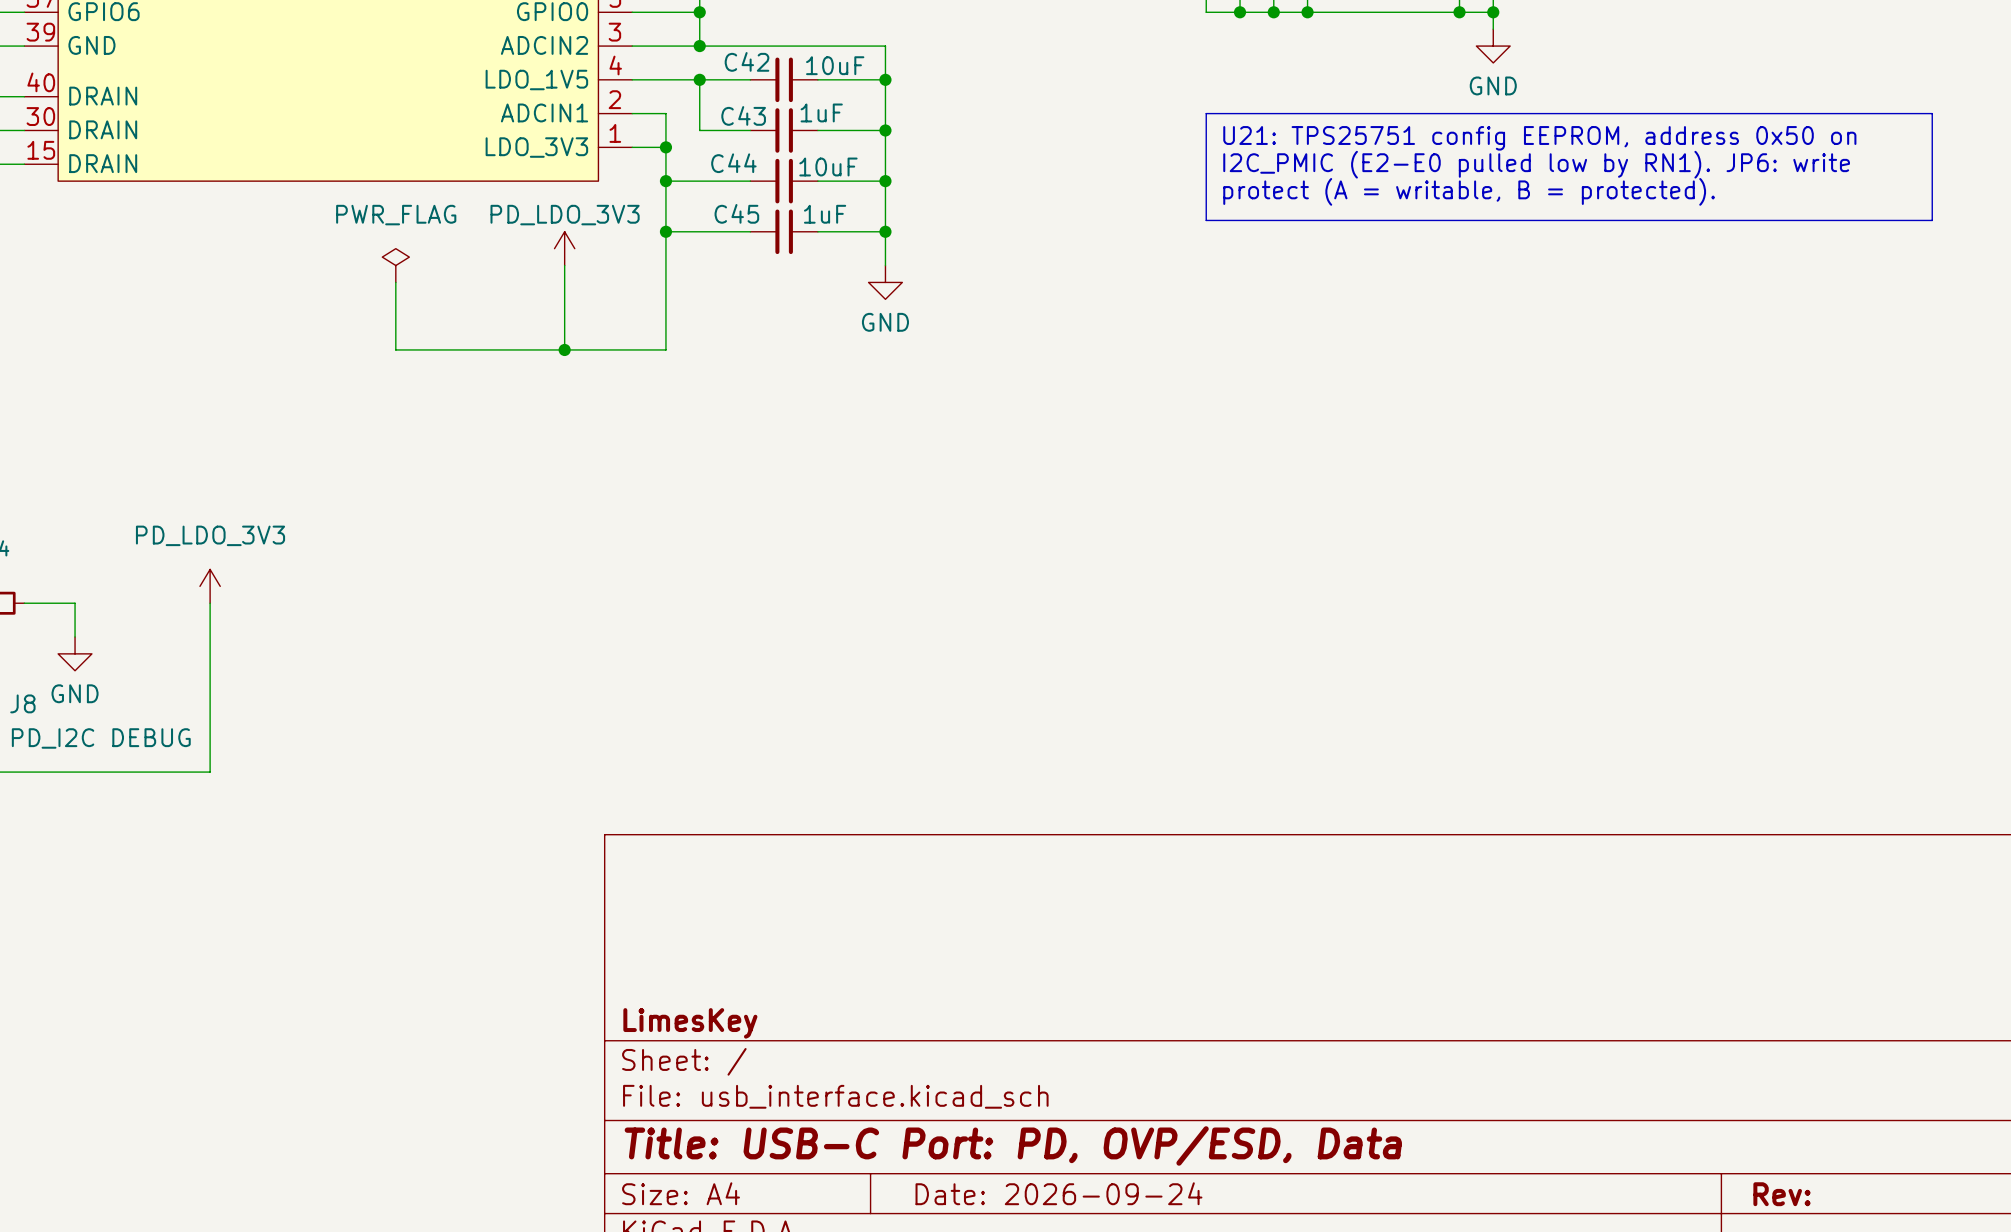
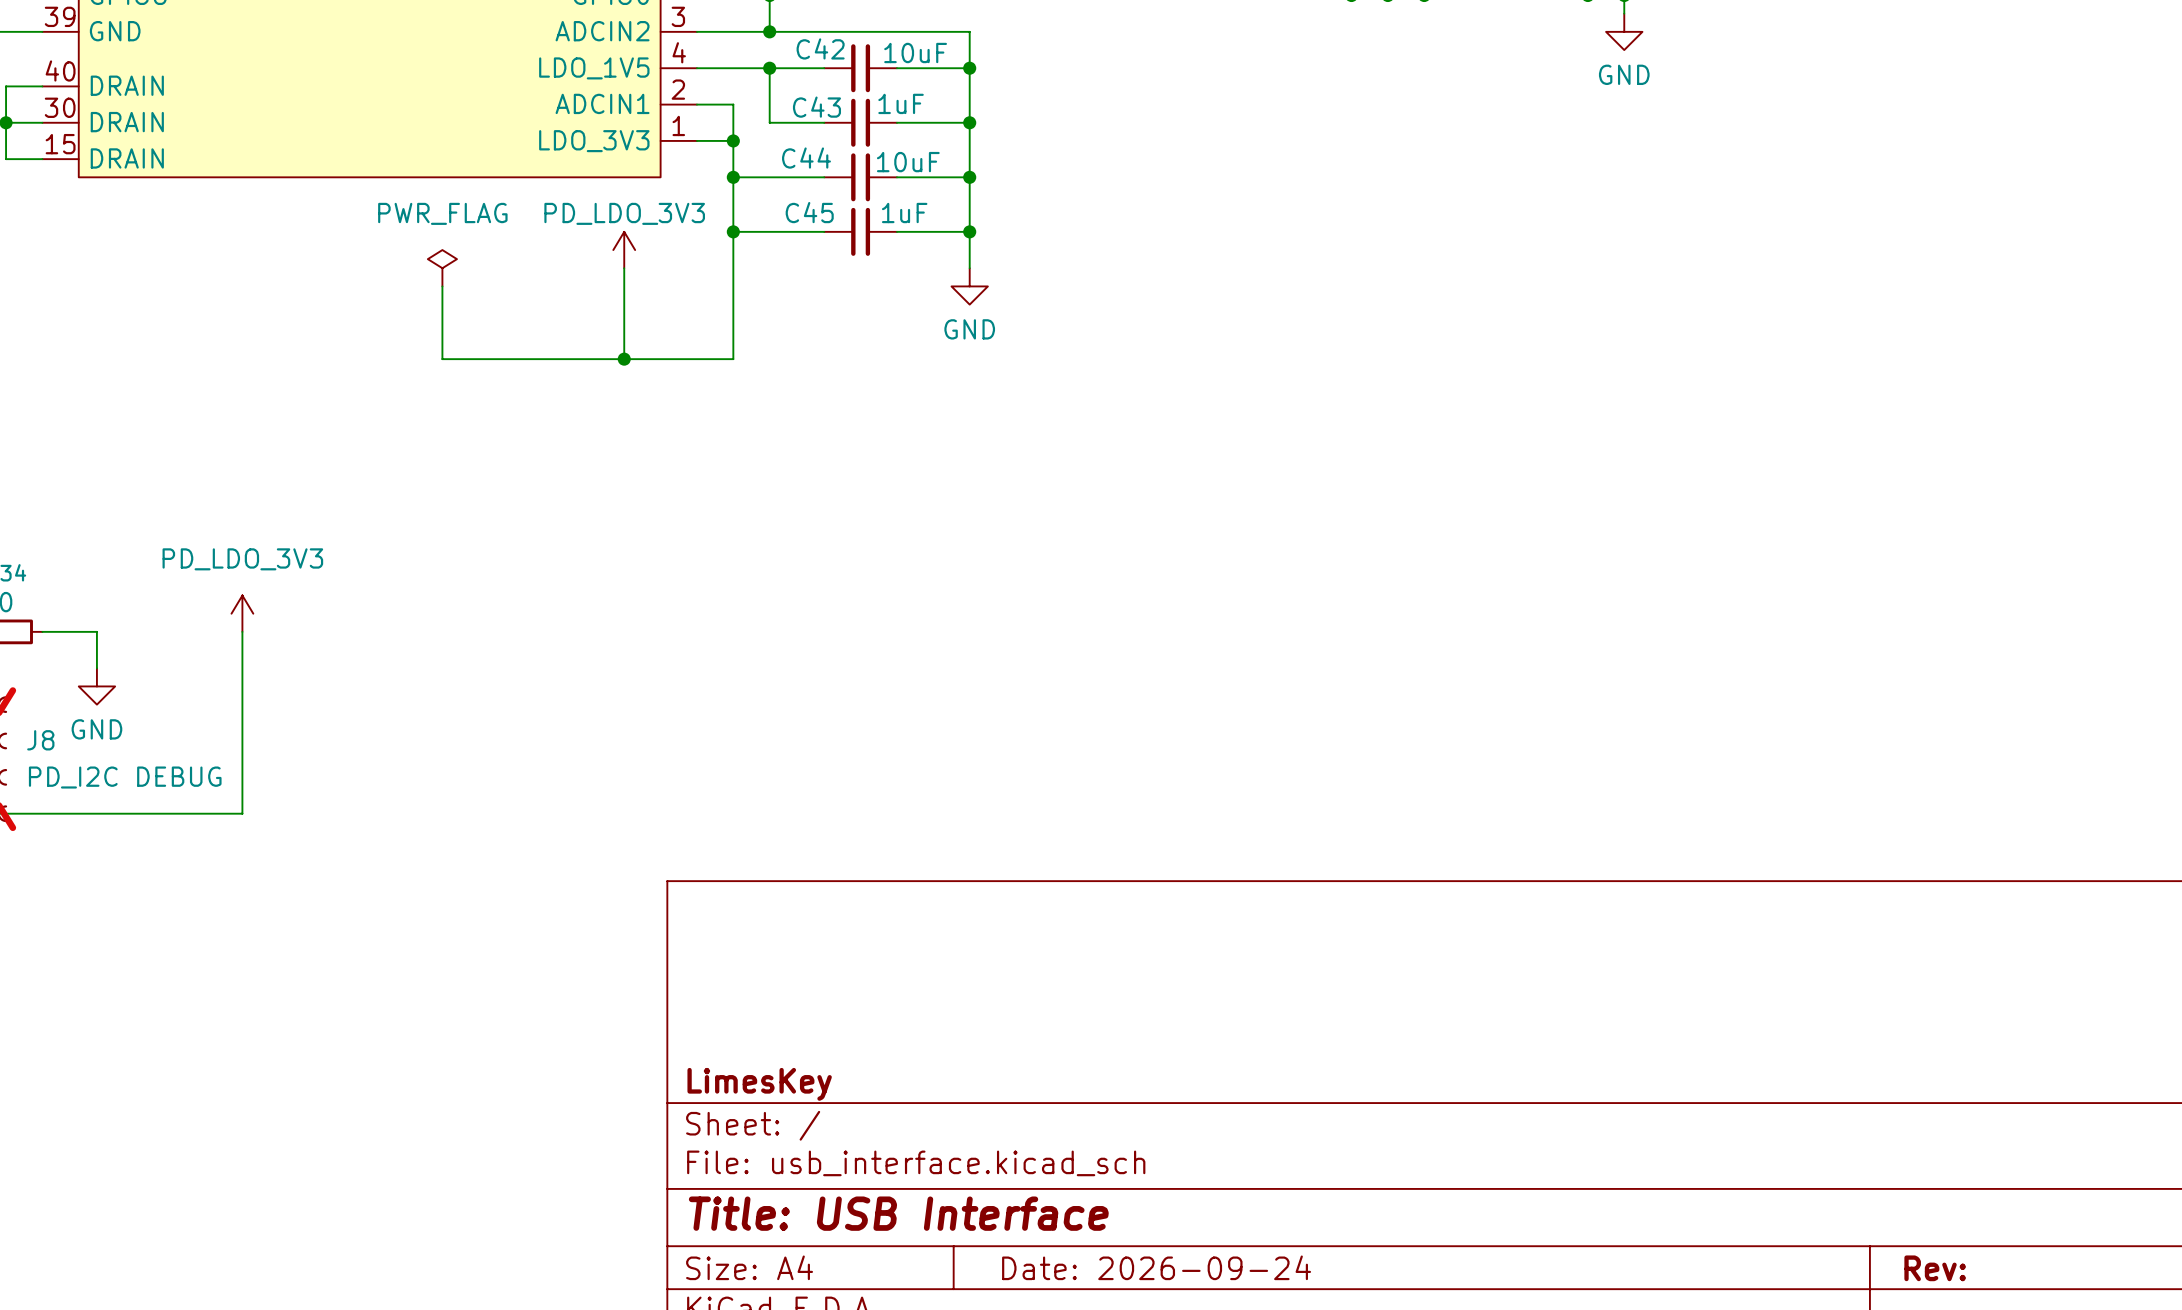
line: (1206, 113) (1932, 113) (1932, 220) (1206, 220) (1206, 113) -> none
text: U21: TPS25751 config EEPROM, address 0x50 on (1539, 138) -> none
text: I2C_PMIC (E2-E0 pulled low by RN1). JP6: write (1536, 164) -> none
text: protect (A = writable, B = protected). (1469, 191) -> none
title block: Title: USB-C Port: PD, OVP/ESD, Data (1013, 1145) -> Title: USB Interface (898, 1213)

